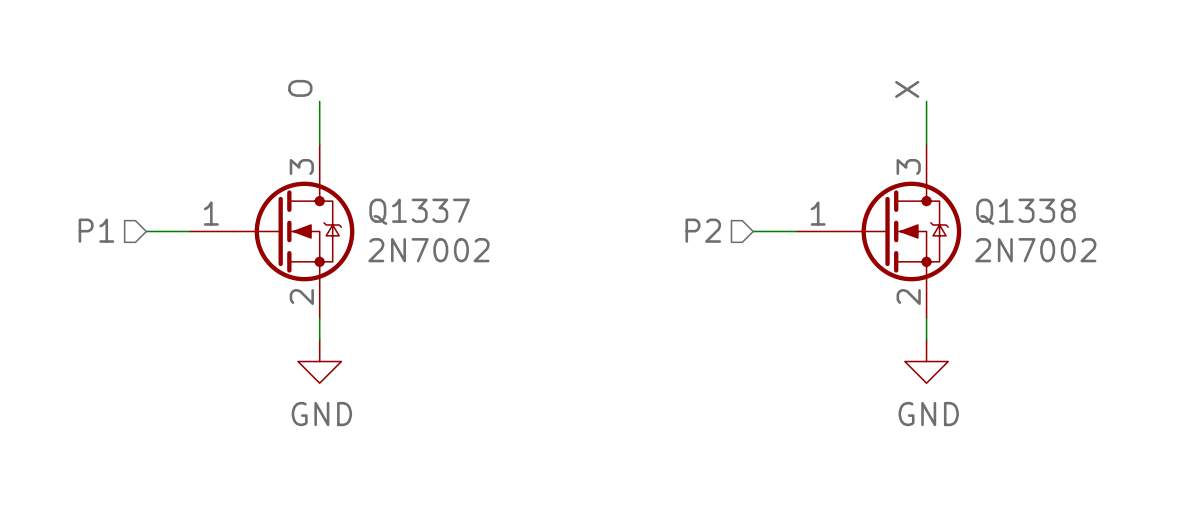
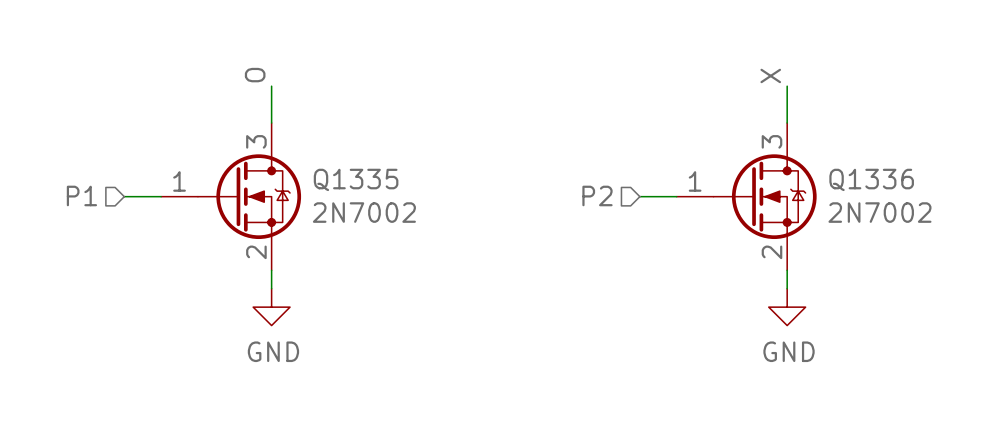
Q1337 name: Q1337 (419, 211) -> Q1335 (356, 179)
Q1338 name: Q1338 (1025, 211) -> Q1336 (871, 179)

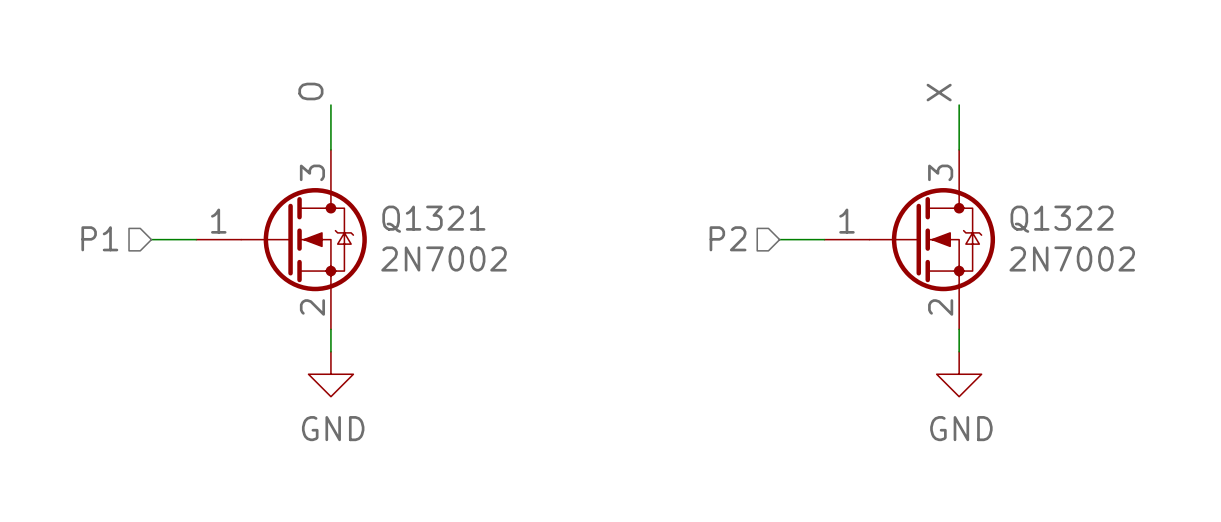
Q1335 name: Q1335 (356, 179) -> Q1321 (433, 219)
Q1336 name: Q1336 (871, 179) -> Q1322 (1062, 219)

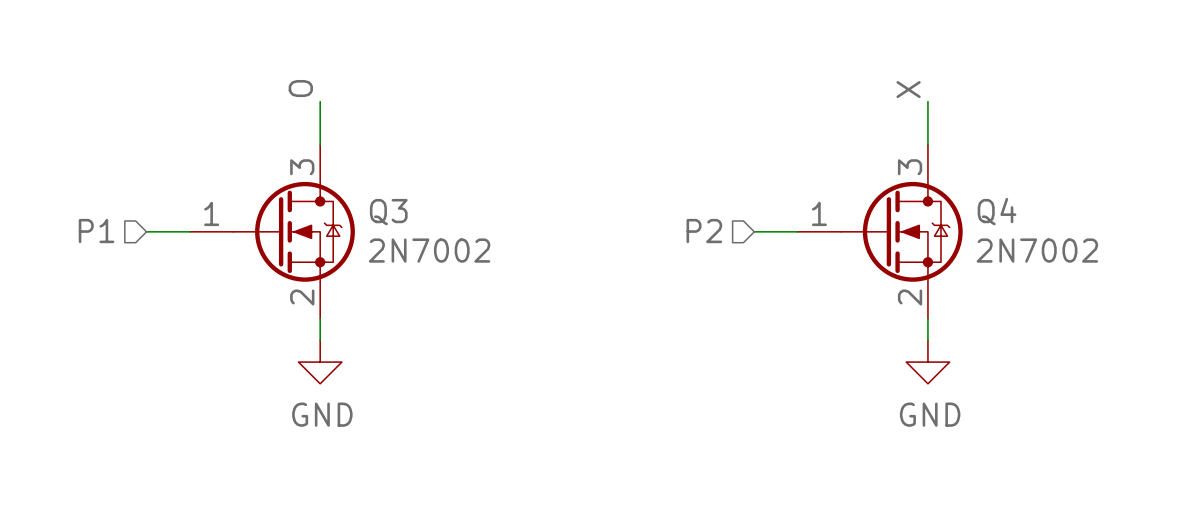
Q1321 name: Q1321 (433, 219) -> Q3 (388, 212)
Q1322 name: Q1322 (1062, 219) -> Q4 (997, 211)

